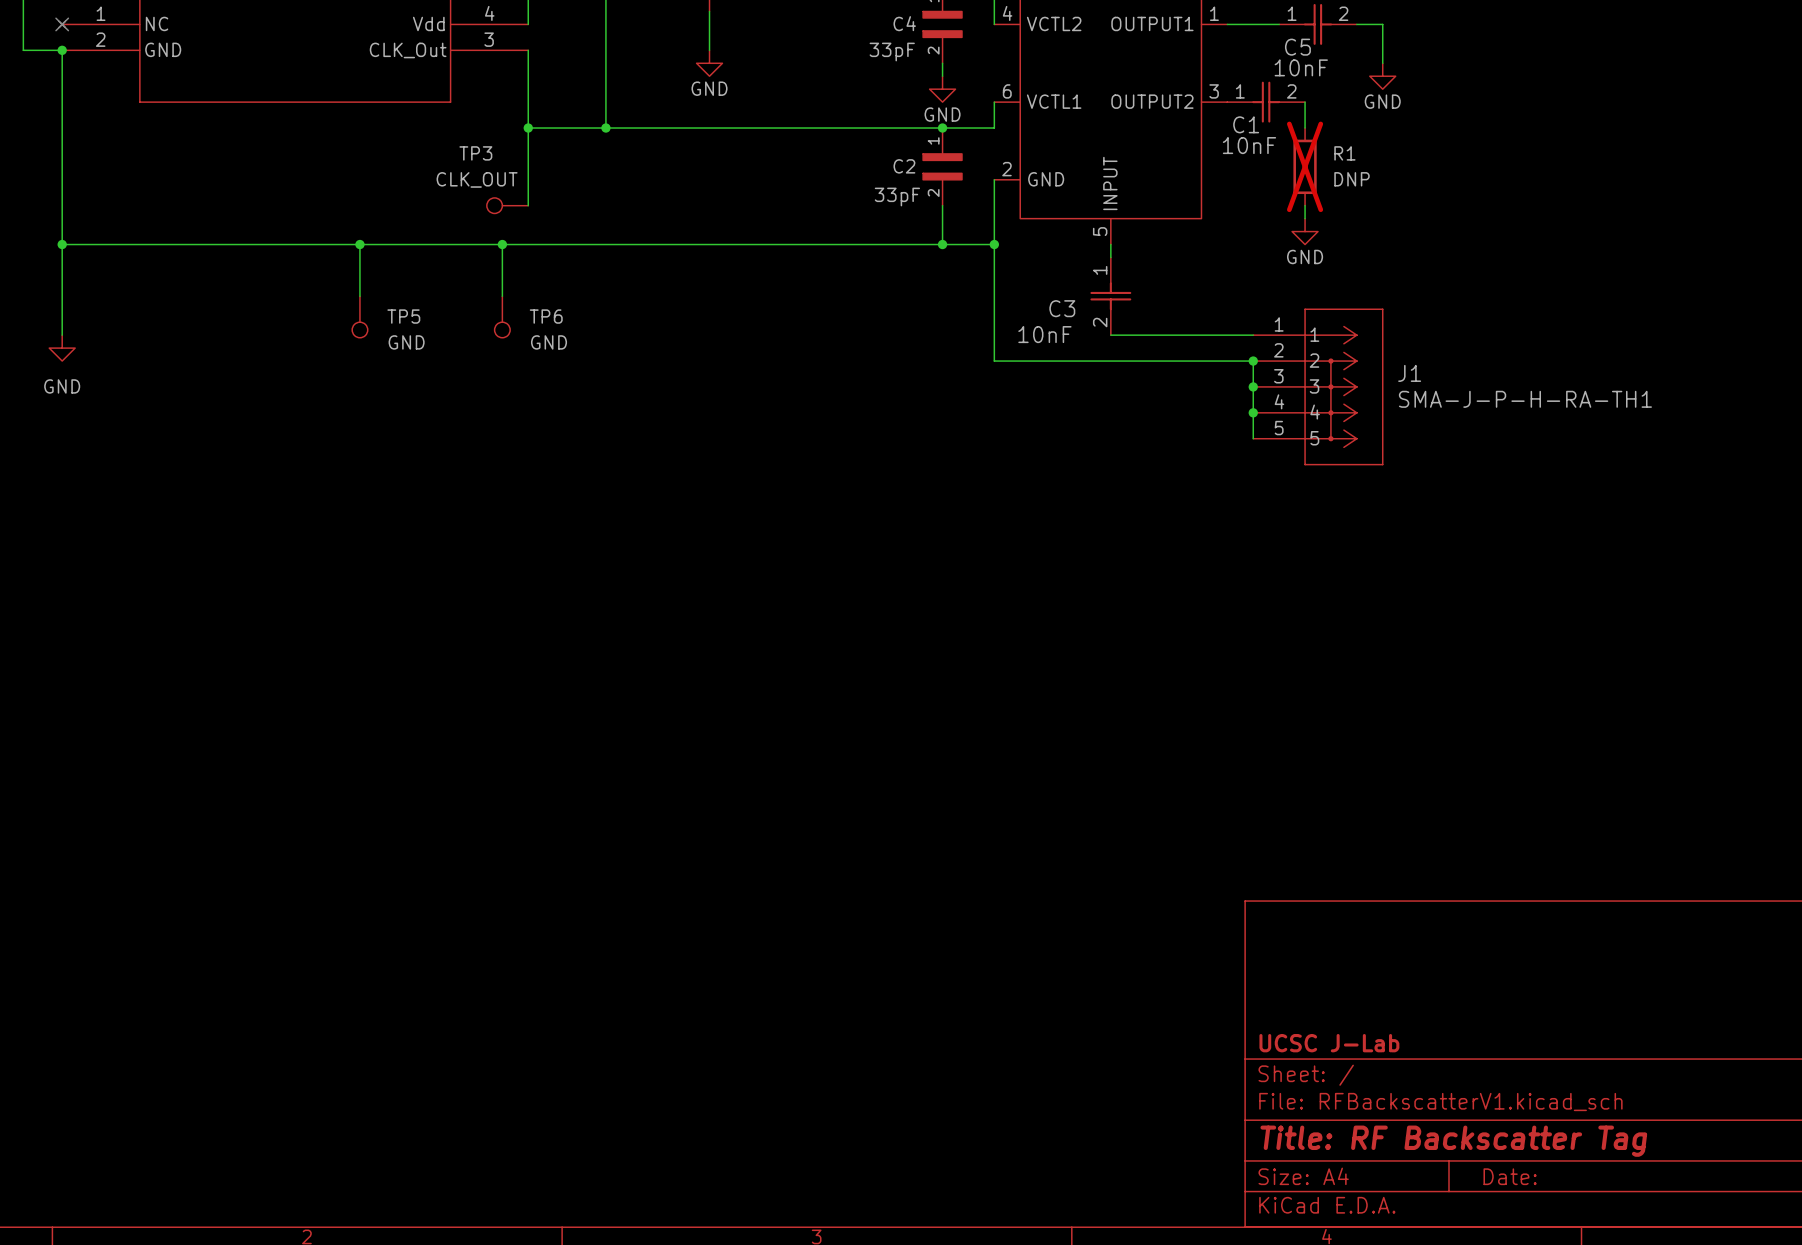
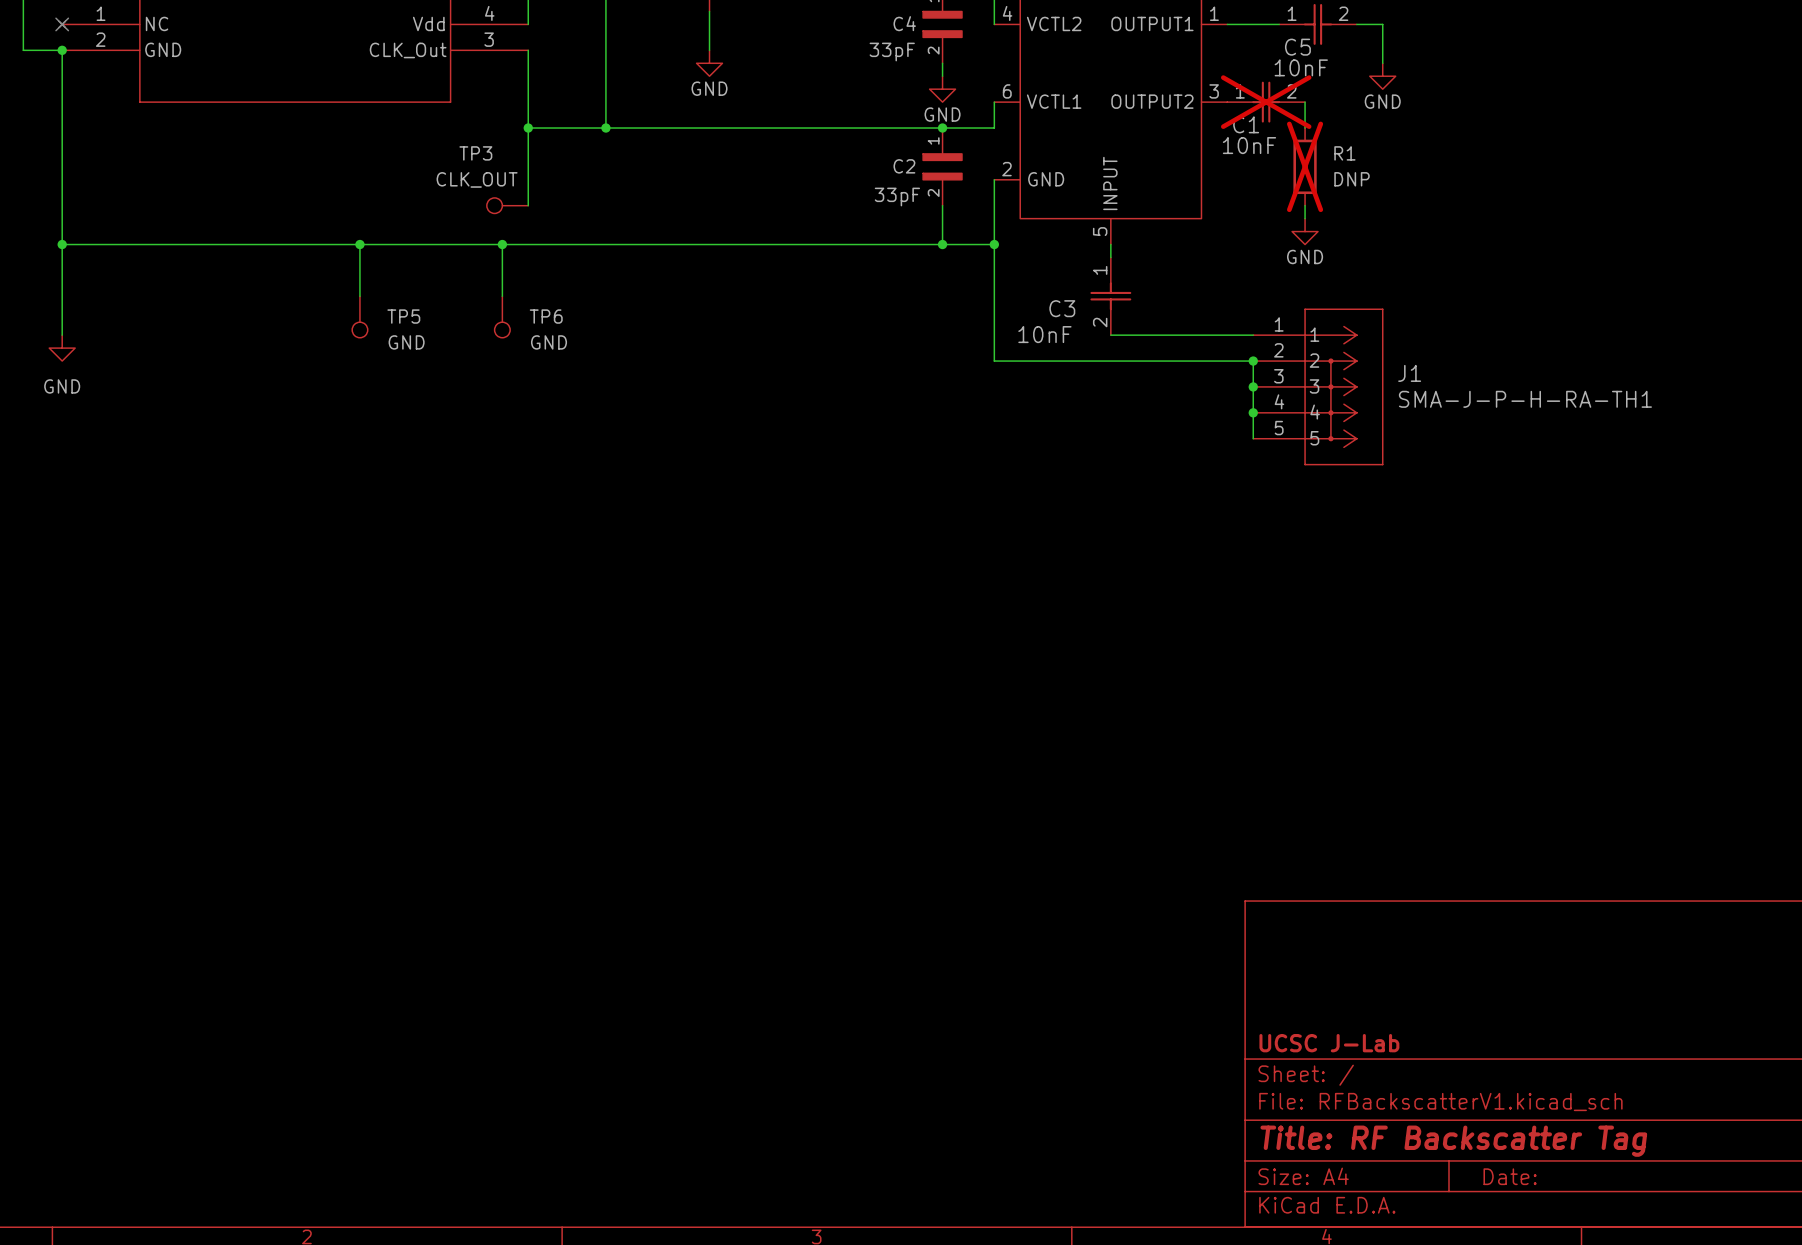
C1 do-not-place cross: none -> (1266, 102)

